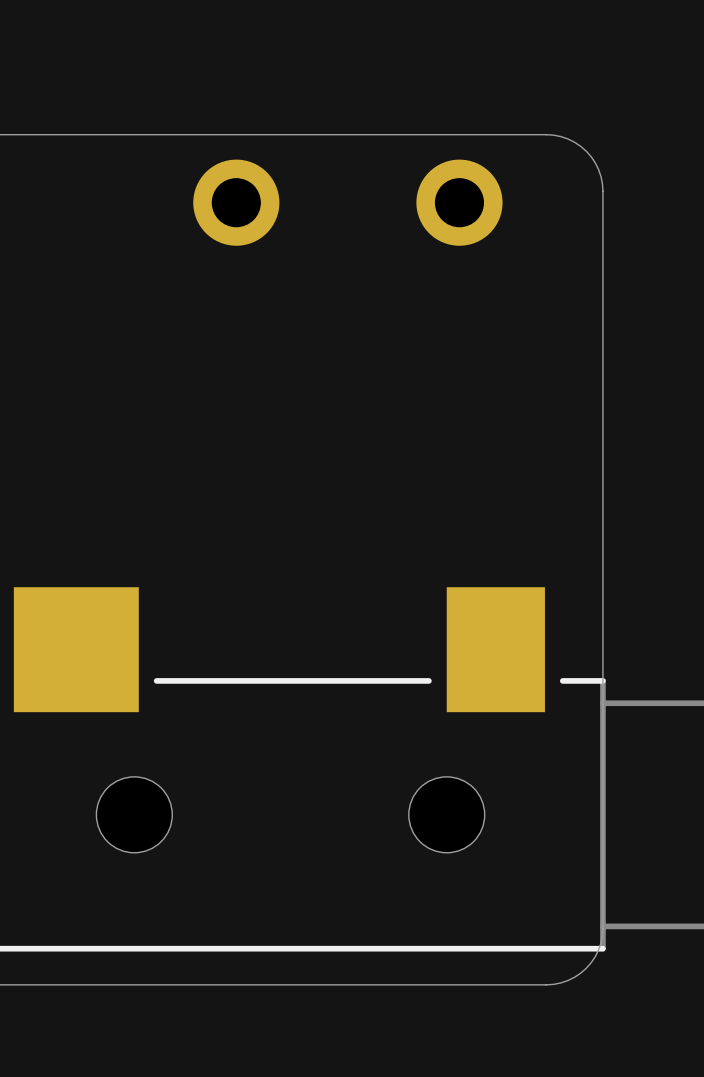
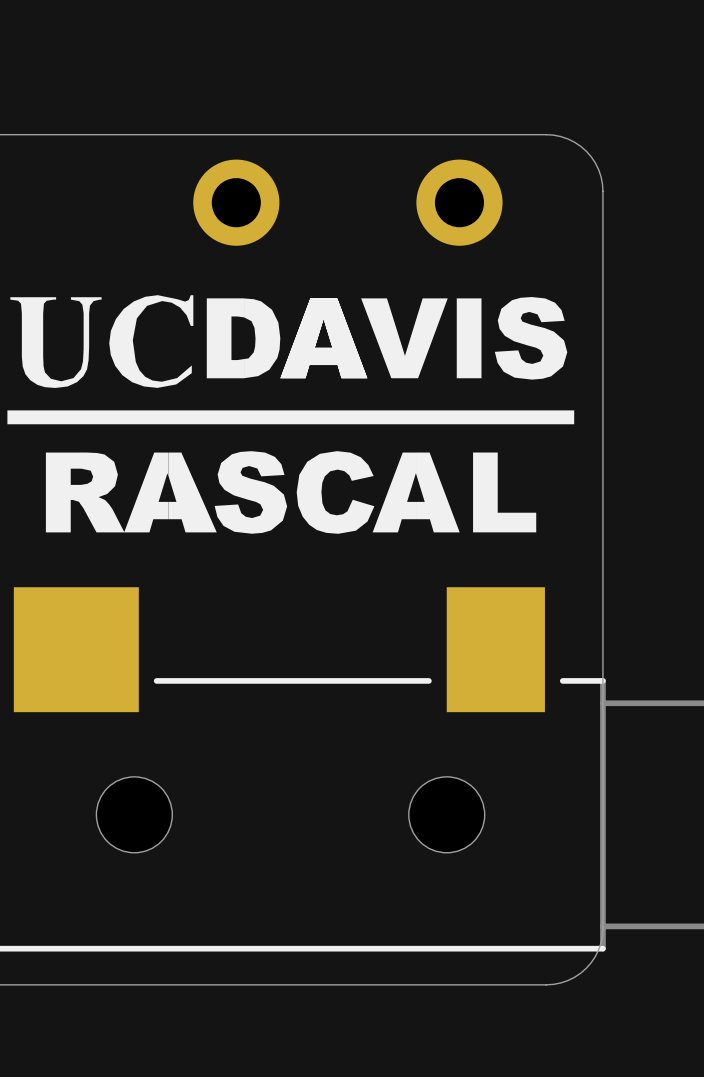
drawing: none -> [7, 295, 575, 534]

